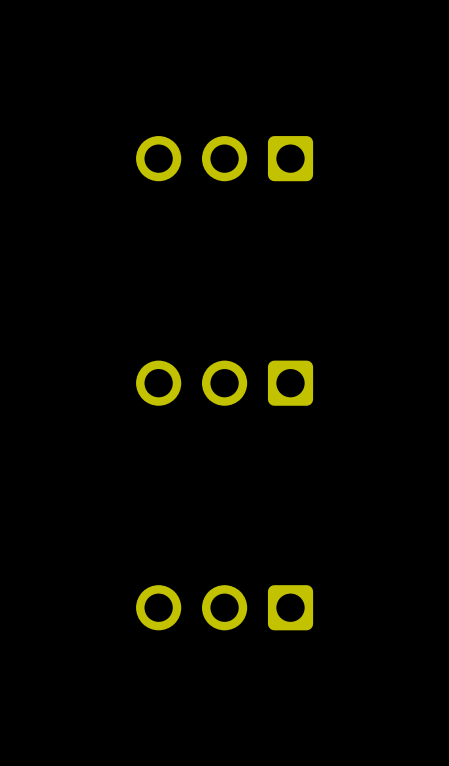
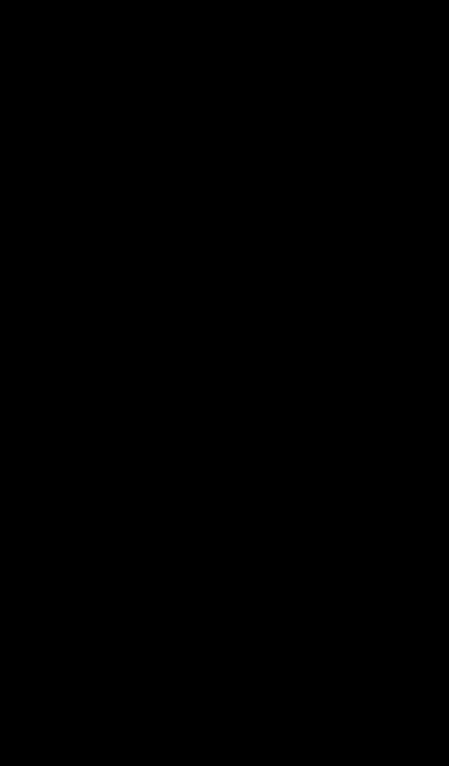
part: (224, 158) -> none
part: (224, 383) -> none
part: (224, 607) -> none

